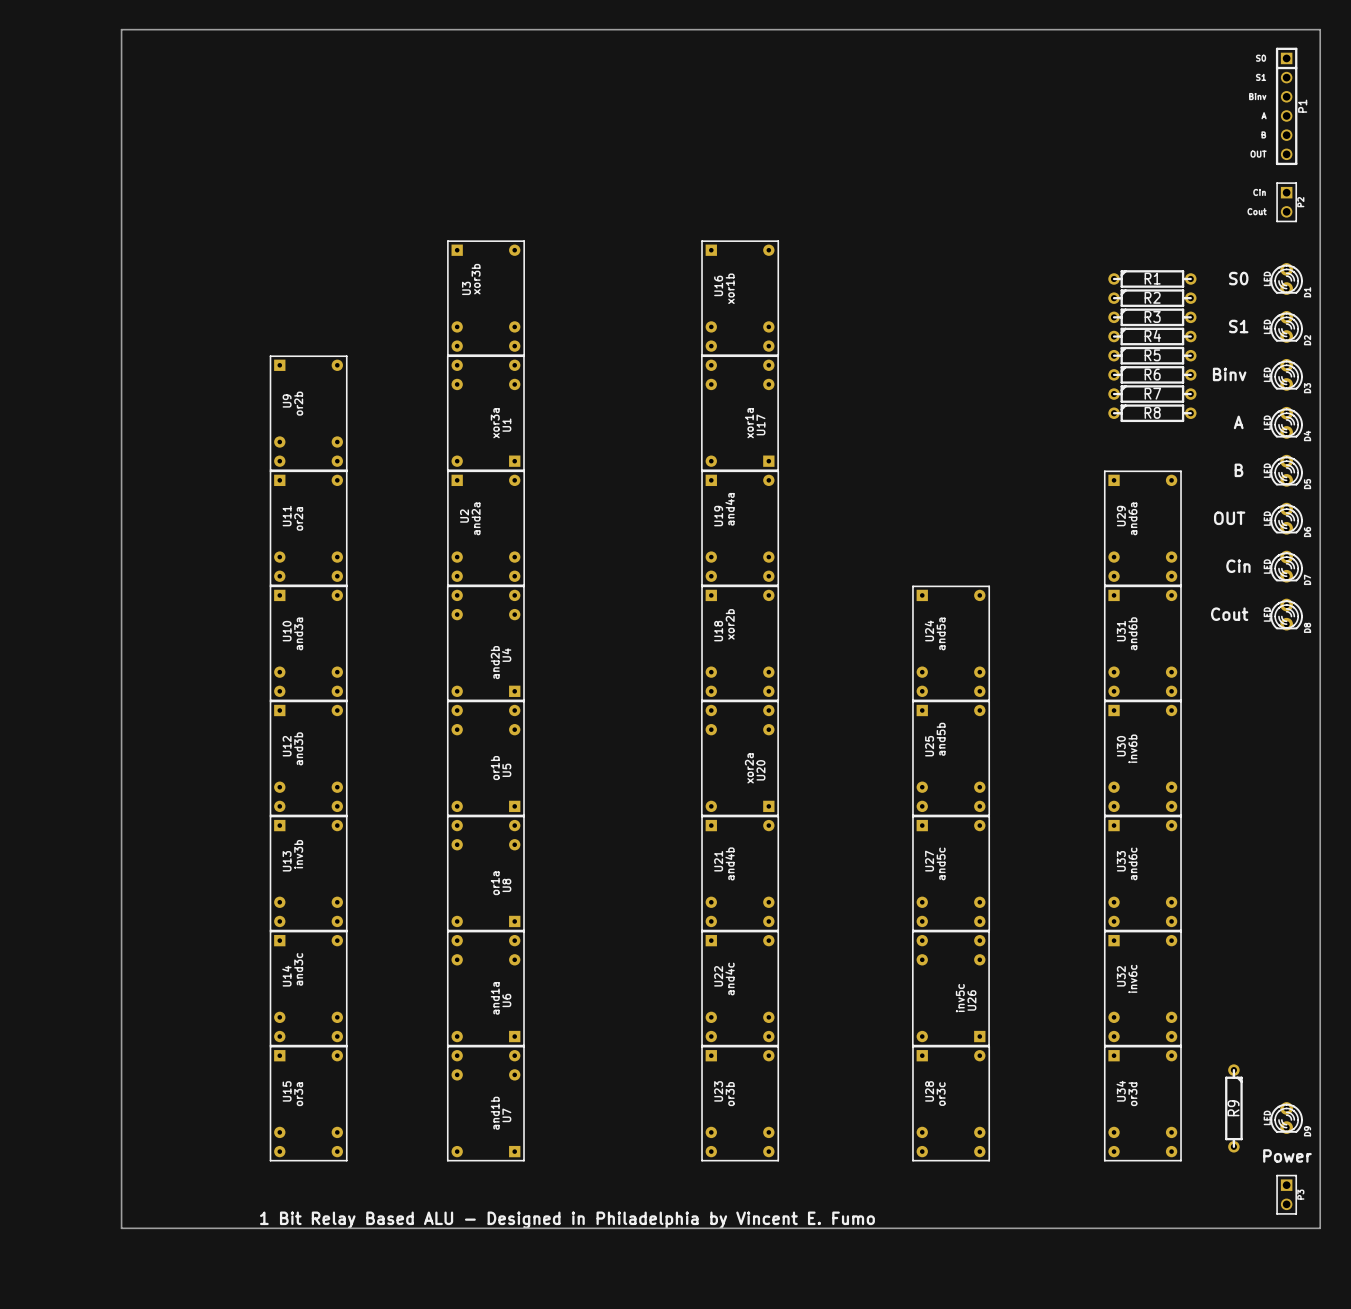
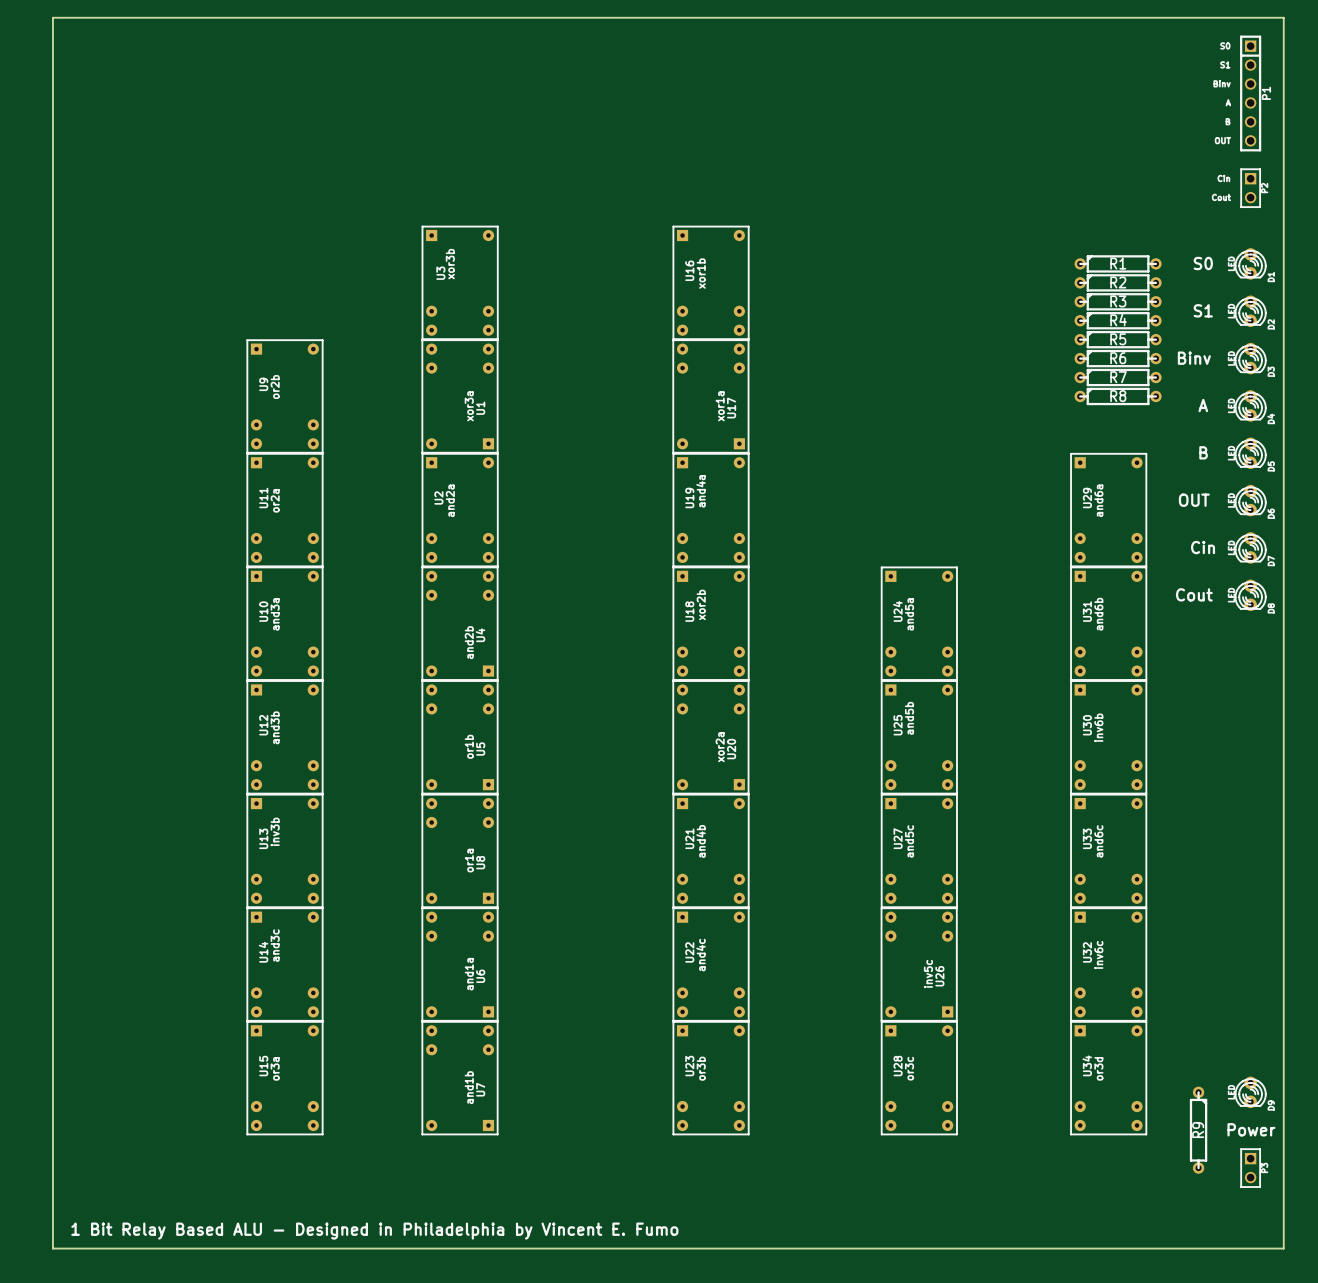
board edge: (121, 29) (121, 1228) (1320, 1228) -> (100, 17) (52, 17) (52, 1248) (1283, 1248) (1283, 1201)
R9 position: (1233, 1108) -> (1198, 1130)
text position: 1 Bit Relay Based ALU - Designed in Philadelphia by Vincent E. Fumo (567, 1220) -> 1 Bit Relay Based ALU - Designed in Philadelphia by Vincent E. Fumo (374, 1231)

